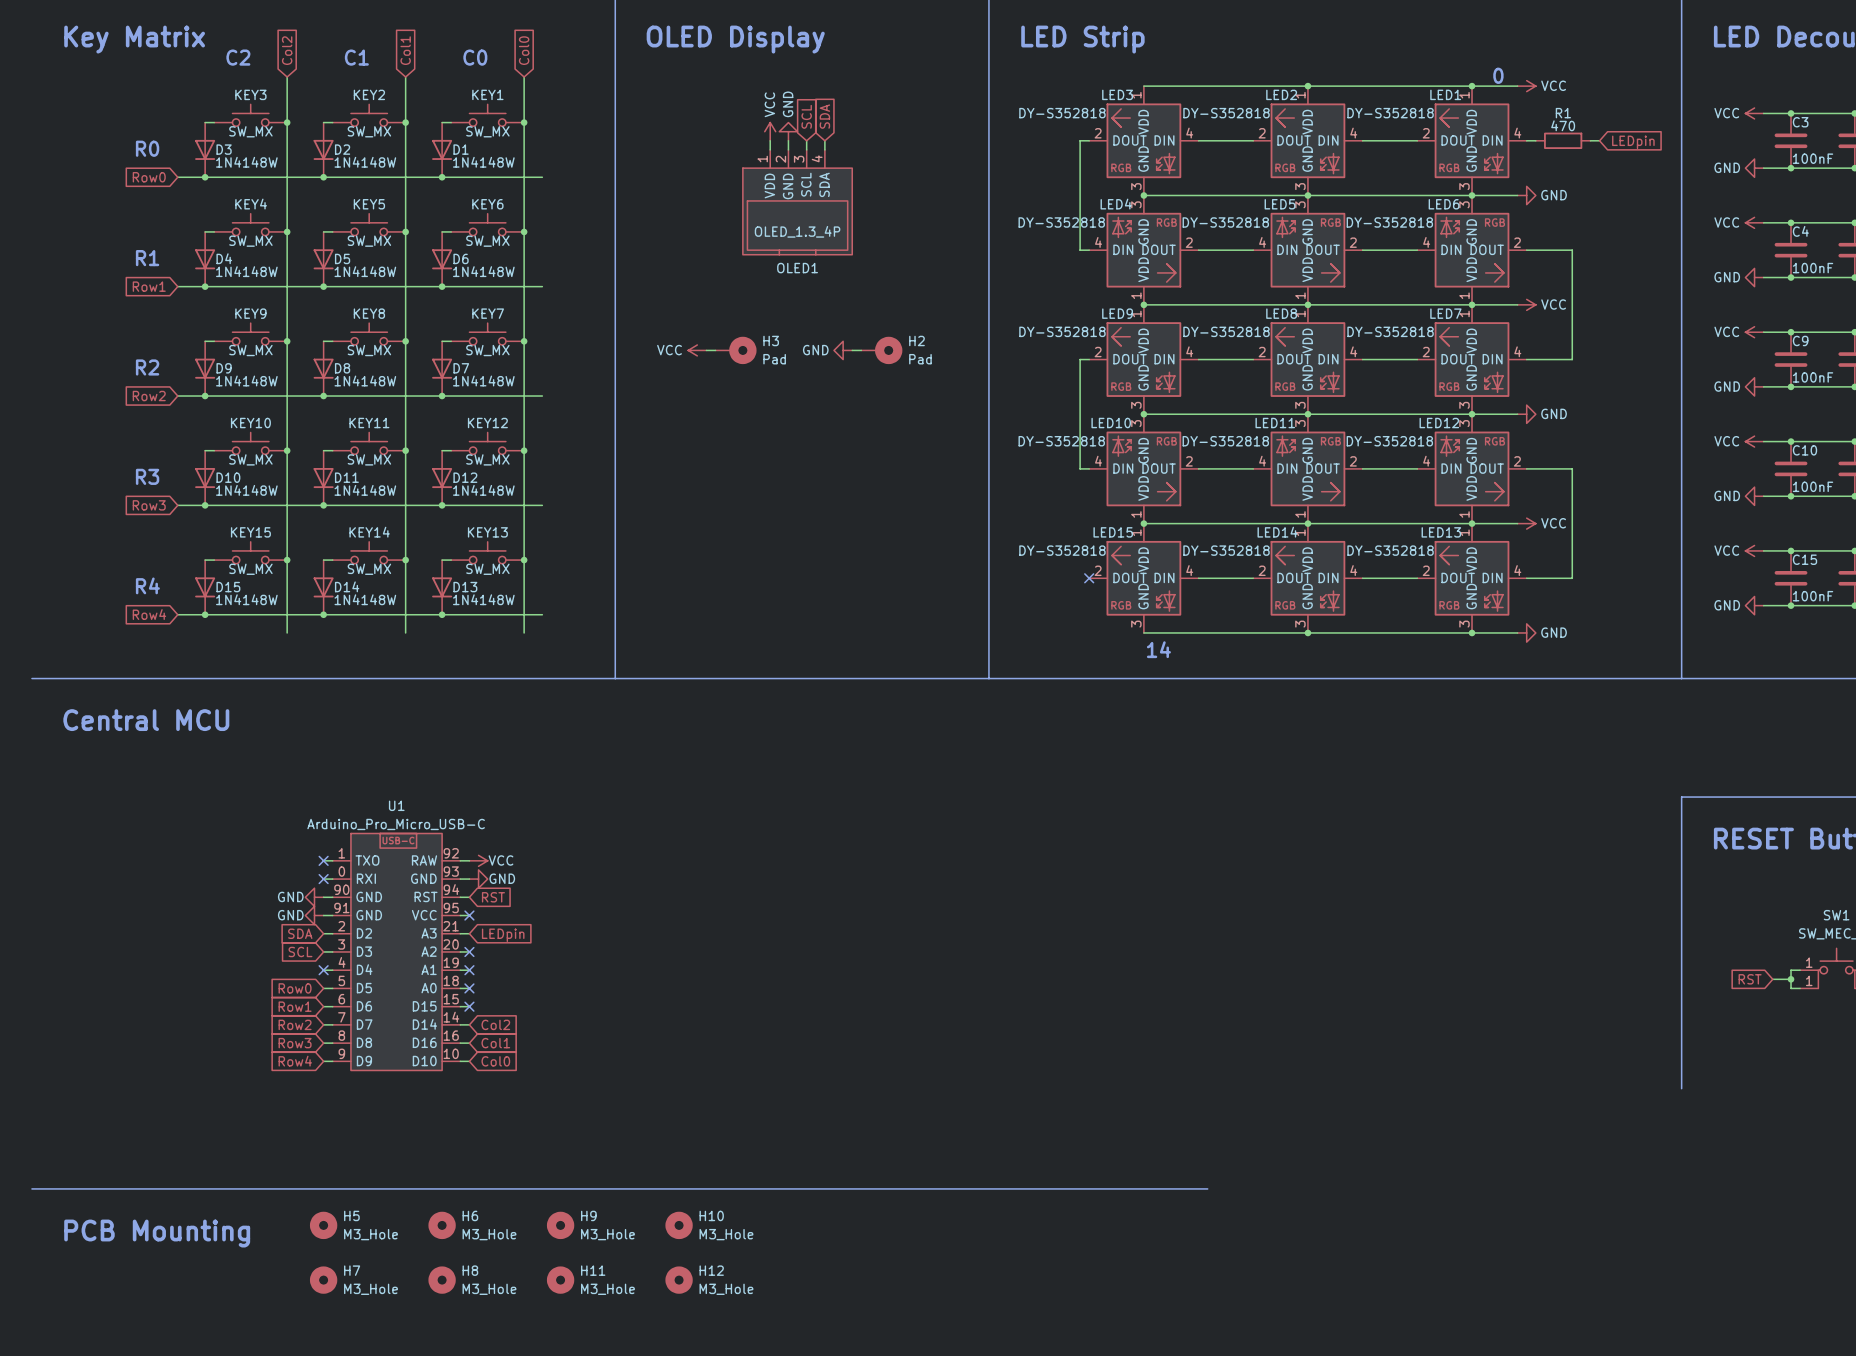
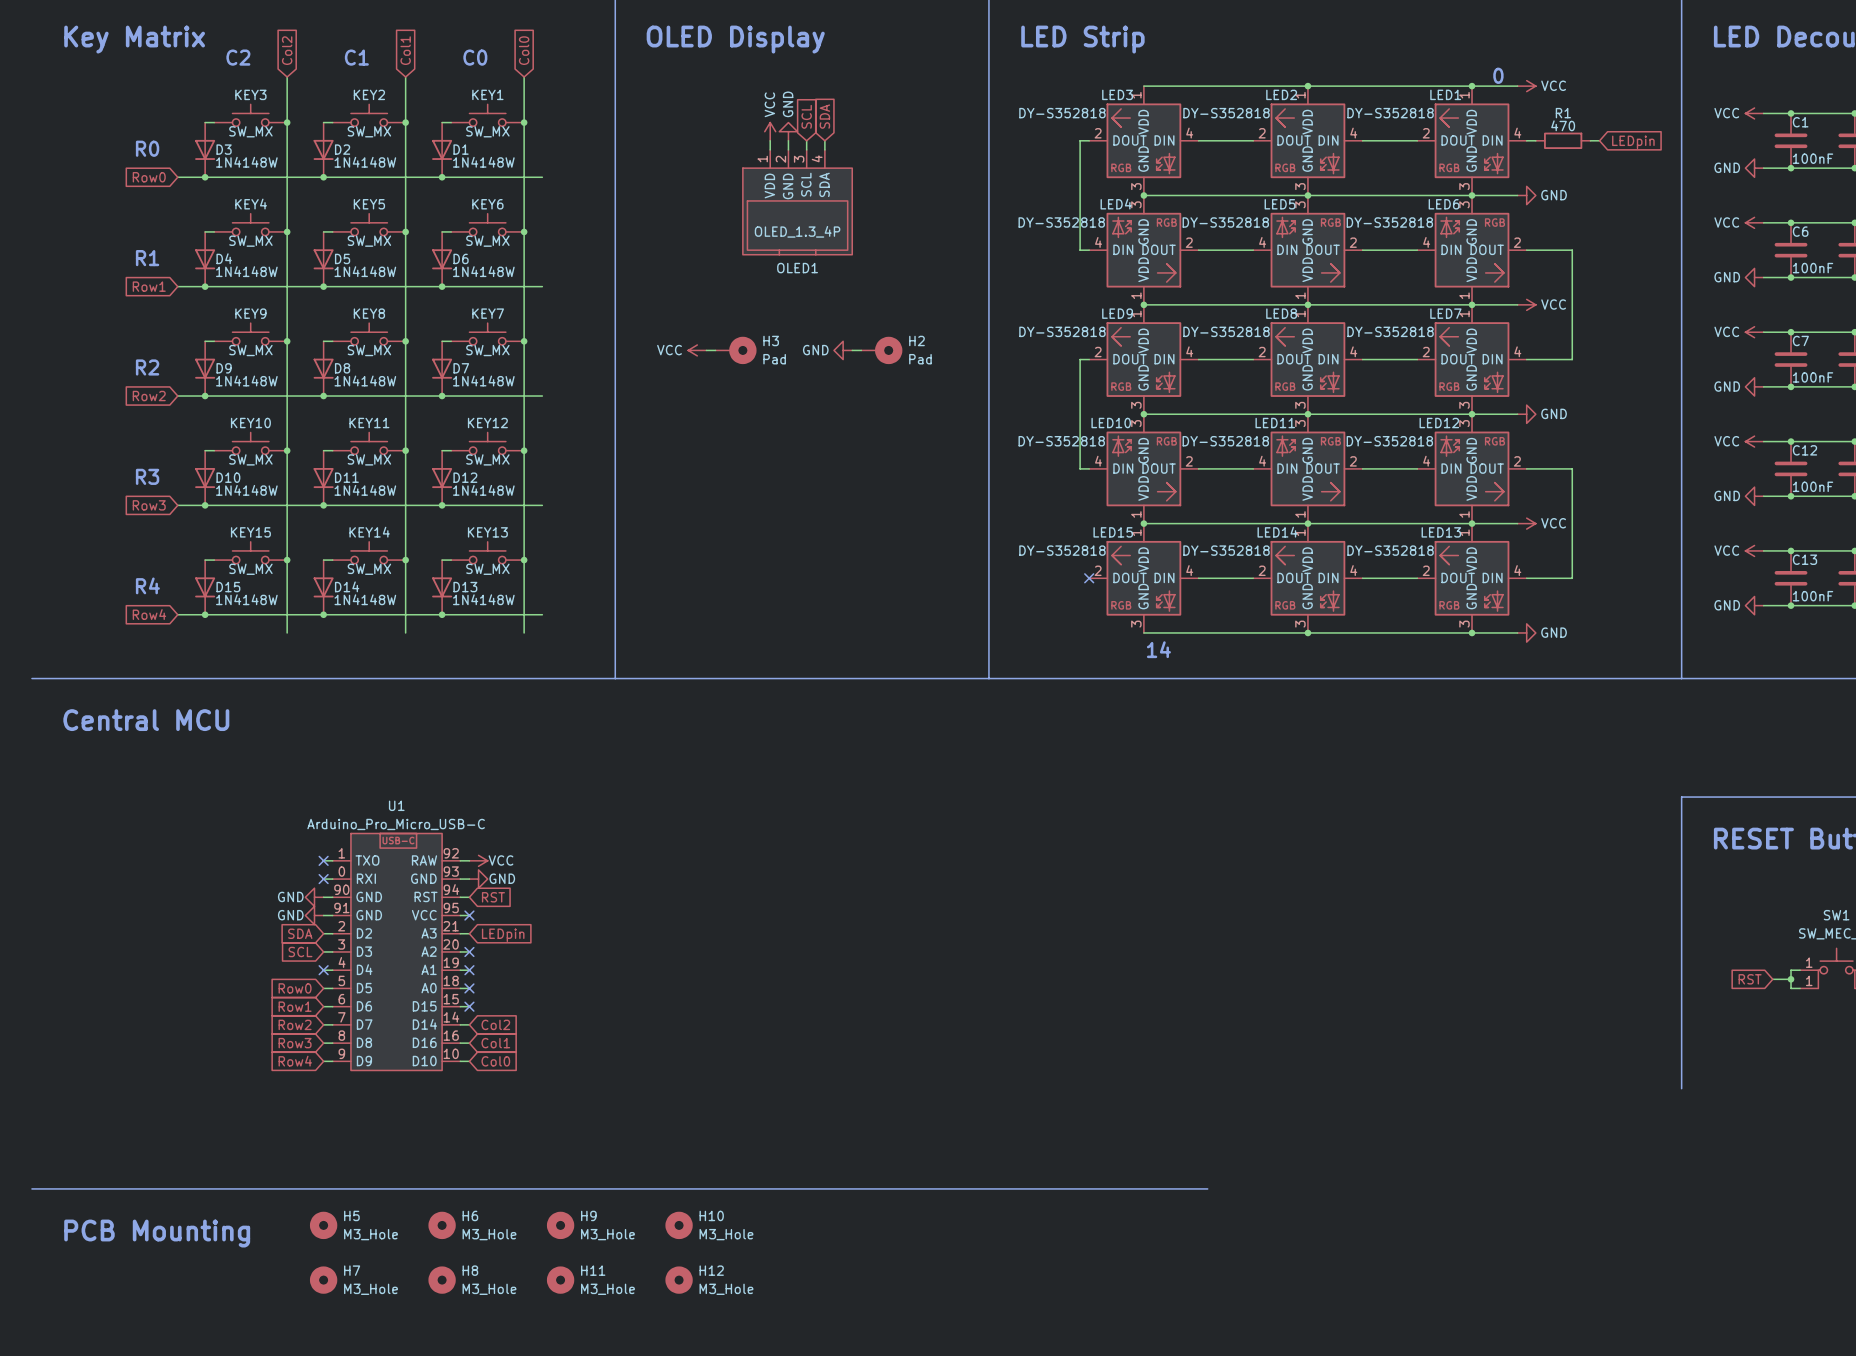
C3 name: C3 (1800, 122) -> C1 (1800, 122)
C4 name: C4 (1800, 231) -> C6 (1800, 231)
C9 name: C9 (1800, 340) -> C7 (1800, 340)
C10 name: C10 (1804, 450) -> C12 (1804, 450)
C15 name: C15 (1804, 559) -> C13 (1804, 559)

